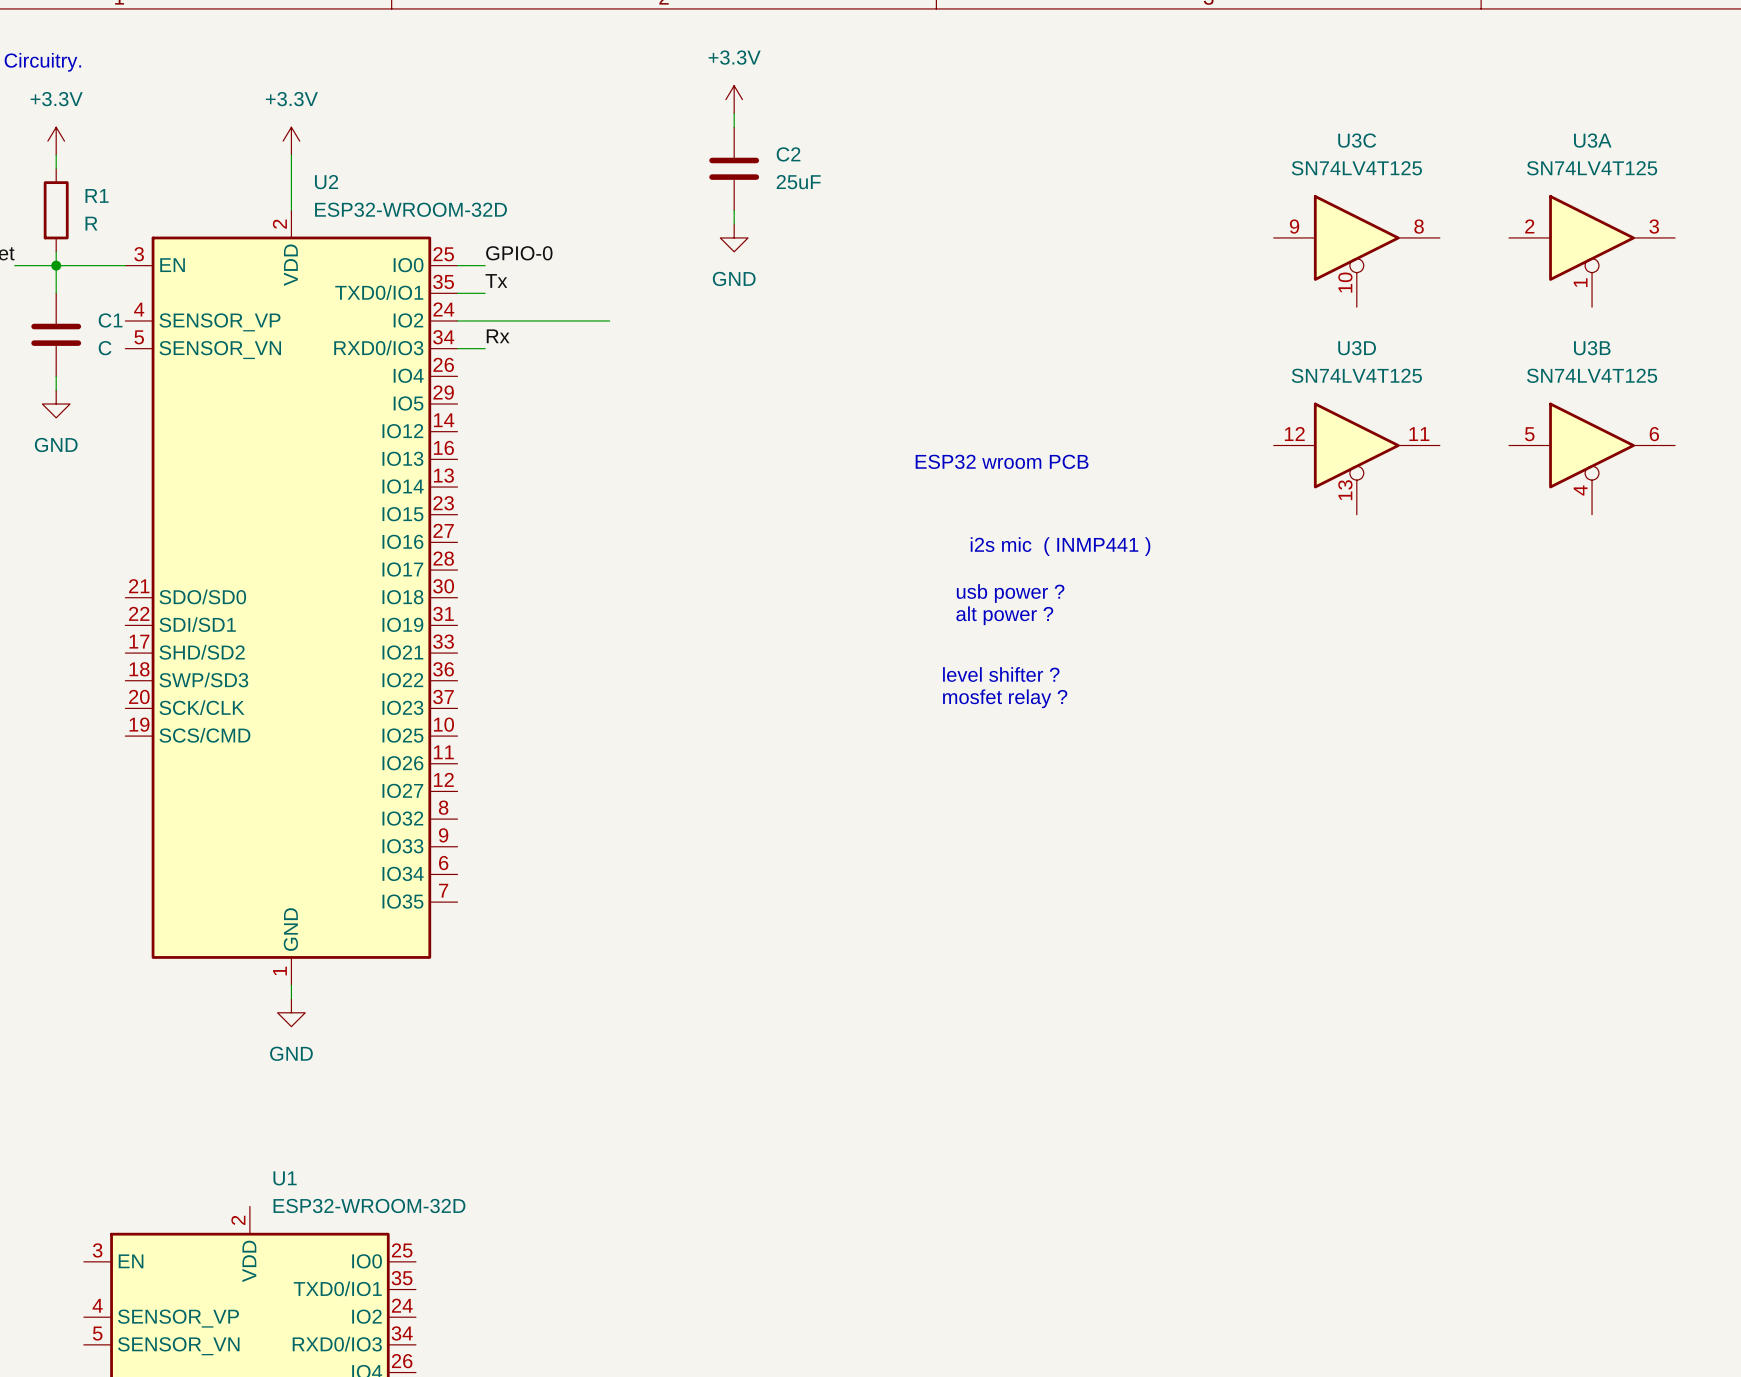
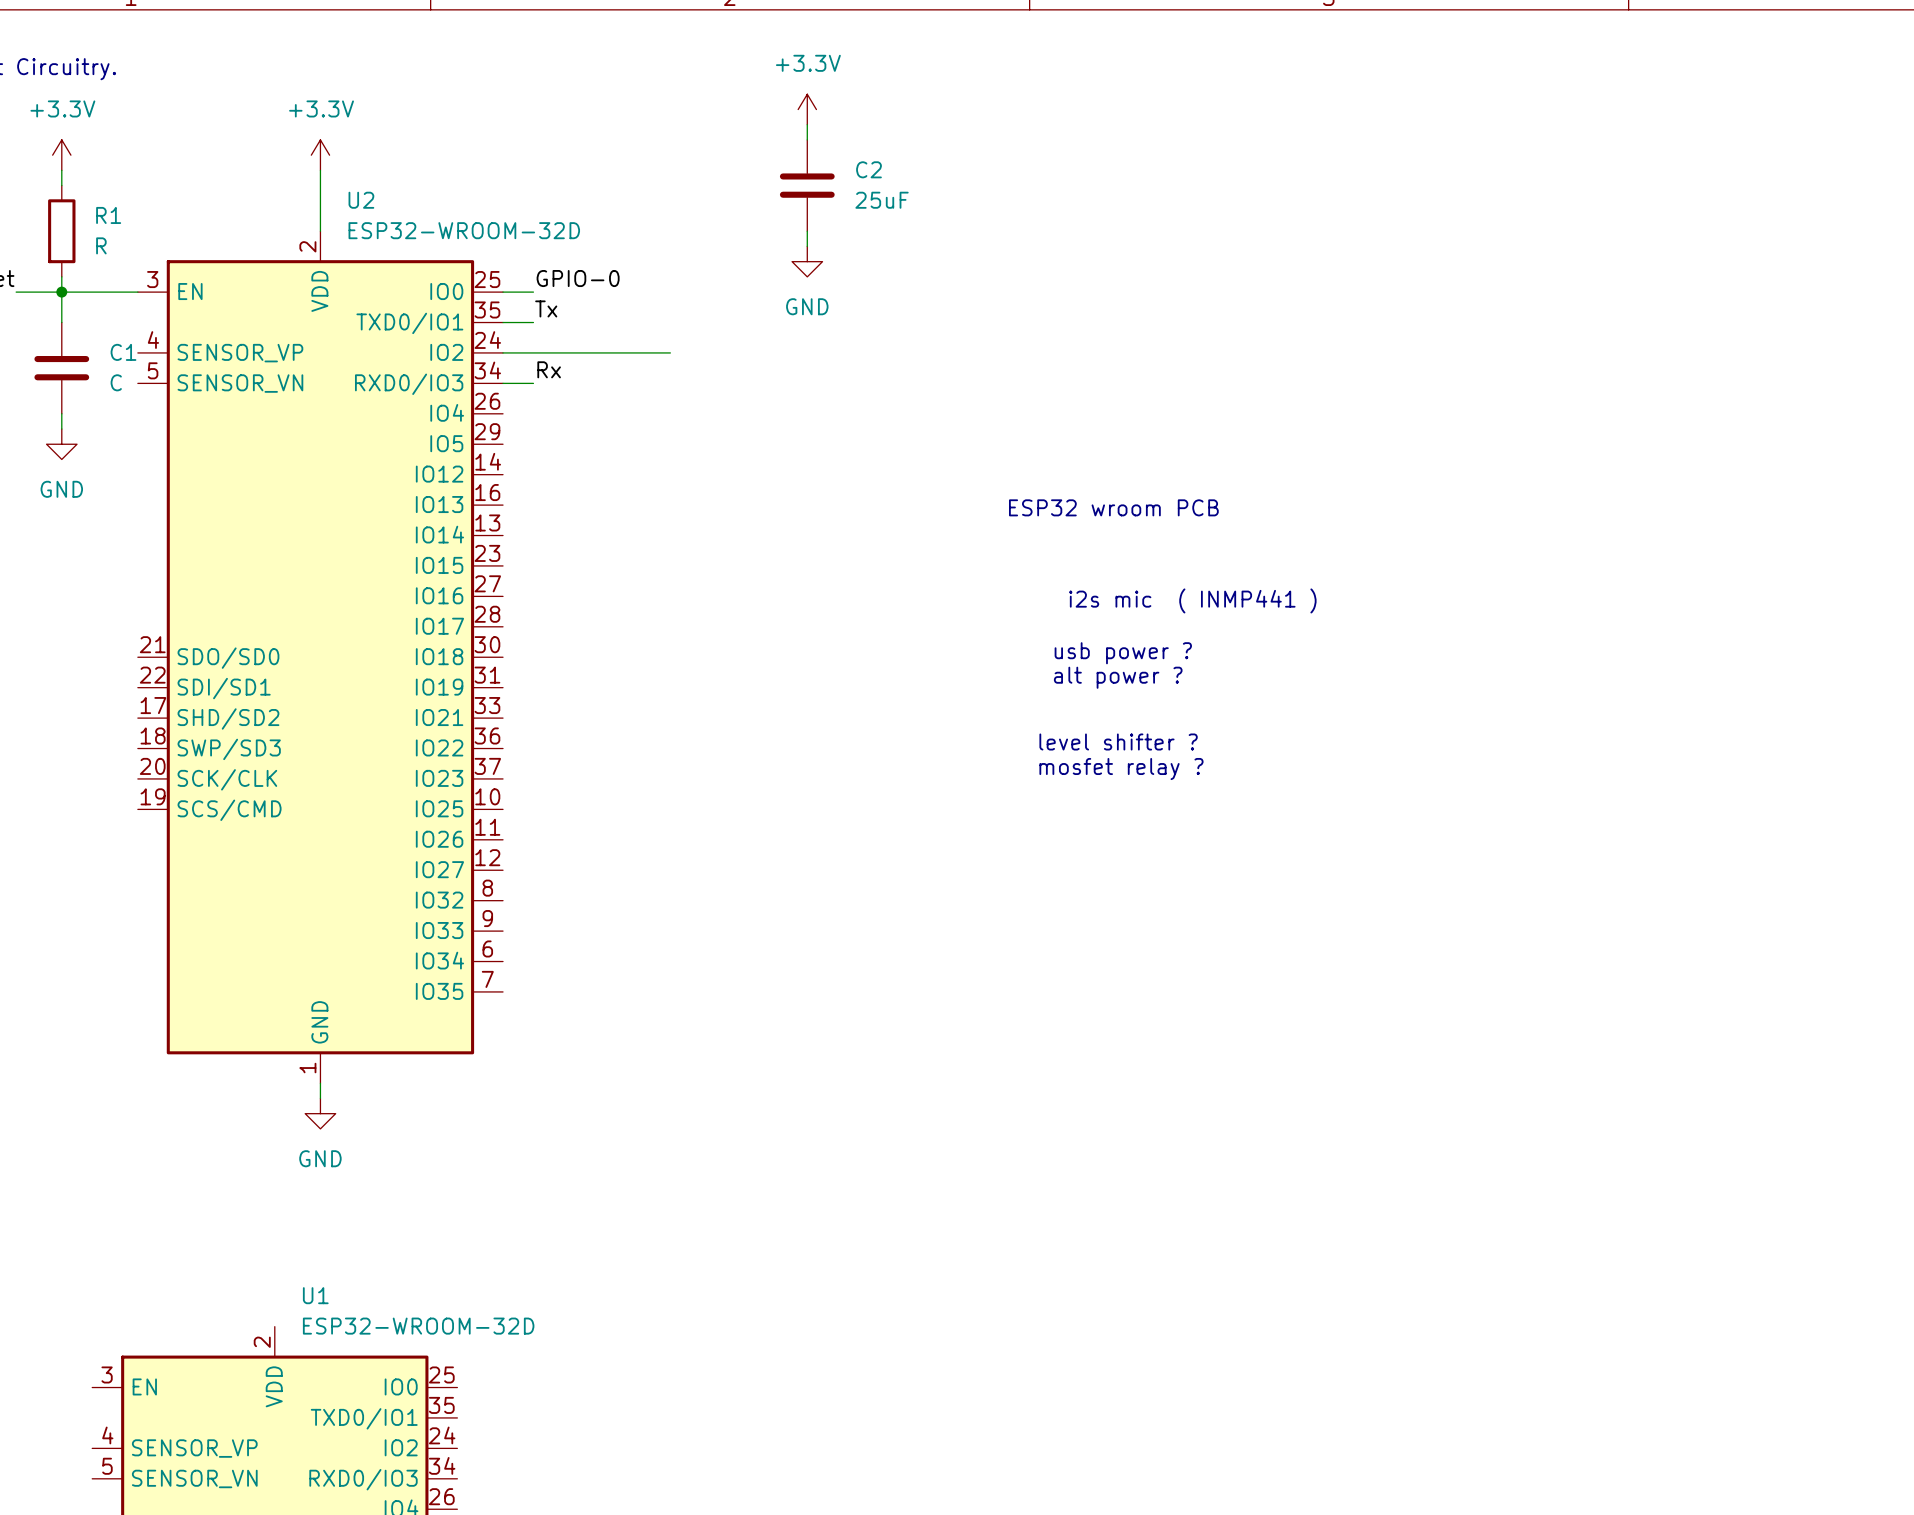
U3C: SN74LV4T125 (1356, 251) -> none
U3A: SN74LV4T125 (1592, 251) -> none
U3D: SN74LV4T125 (1356, 458) -> none
U3B: SN74LV4T125 (1592, 458) -> none

